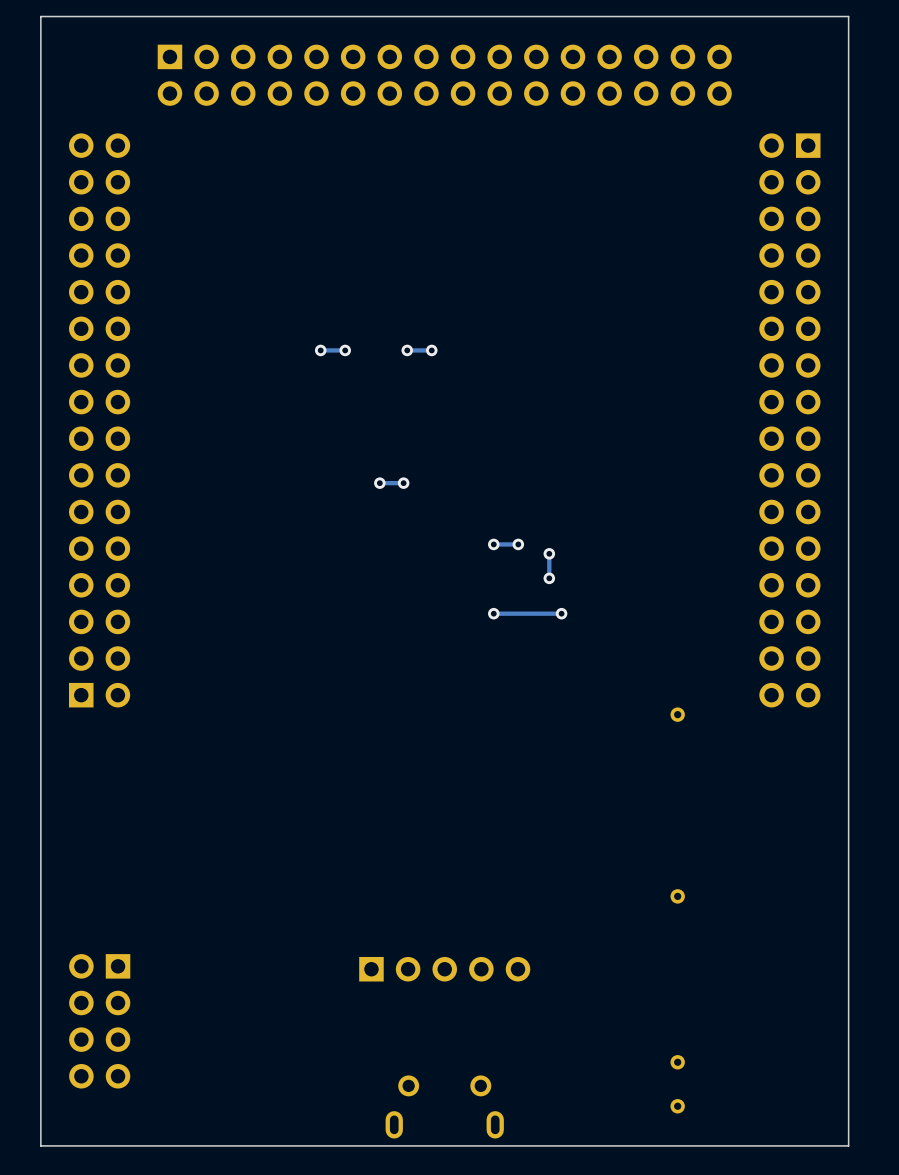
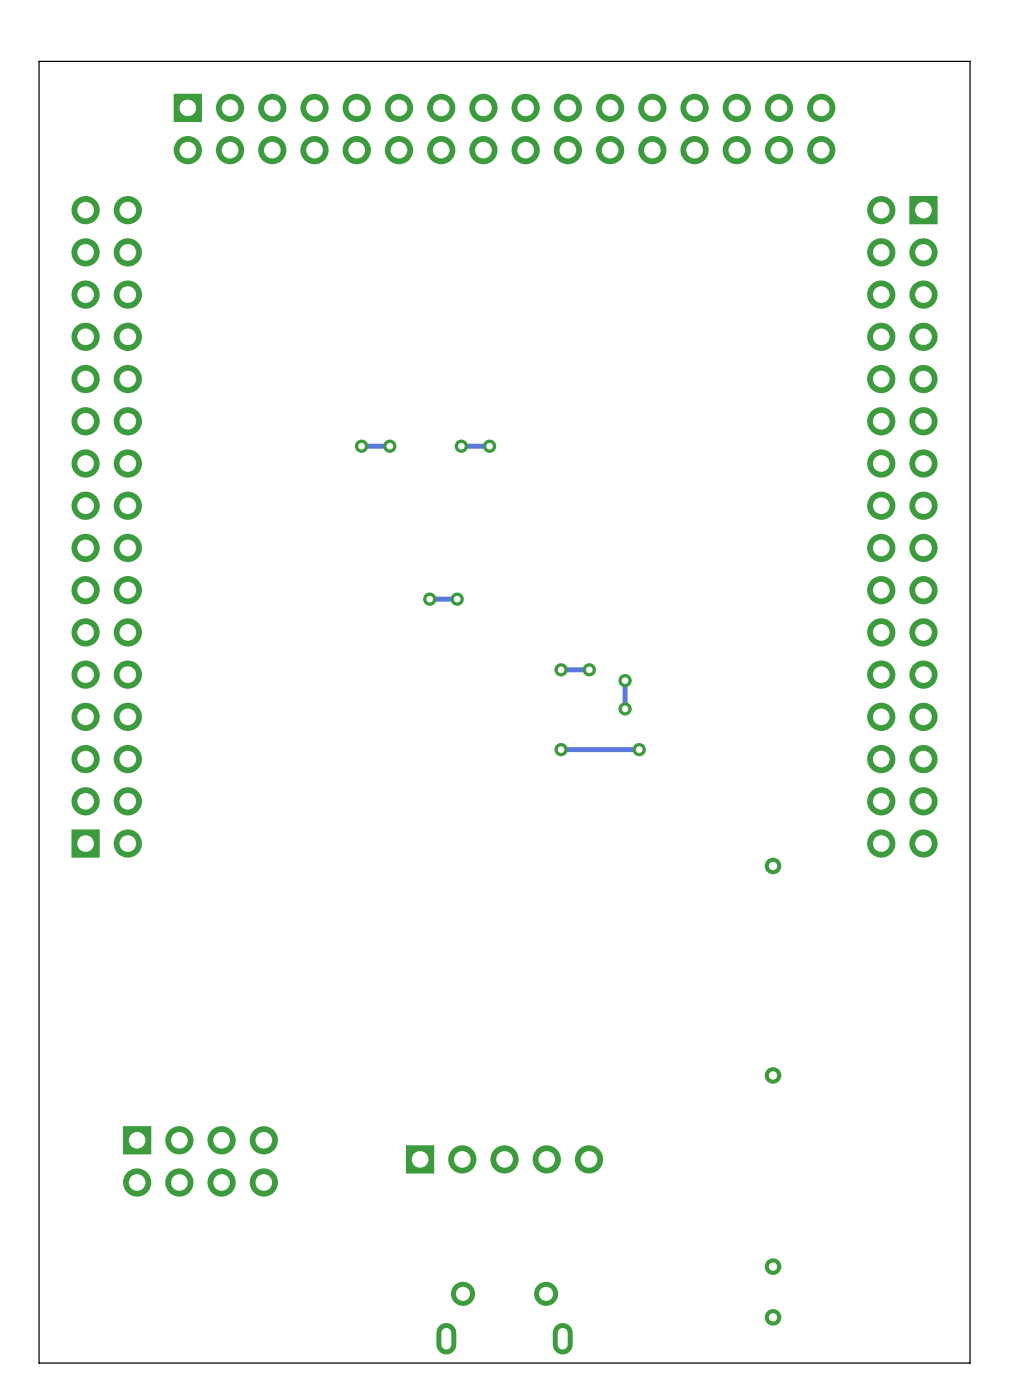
part rotation: 0° (99, 1021) -> 90° counterclockwise (200, 1161)
part position: (99, 1021) -> (200, 1161)

